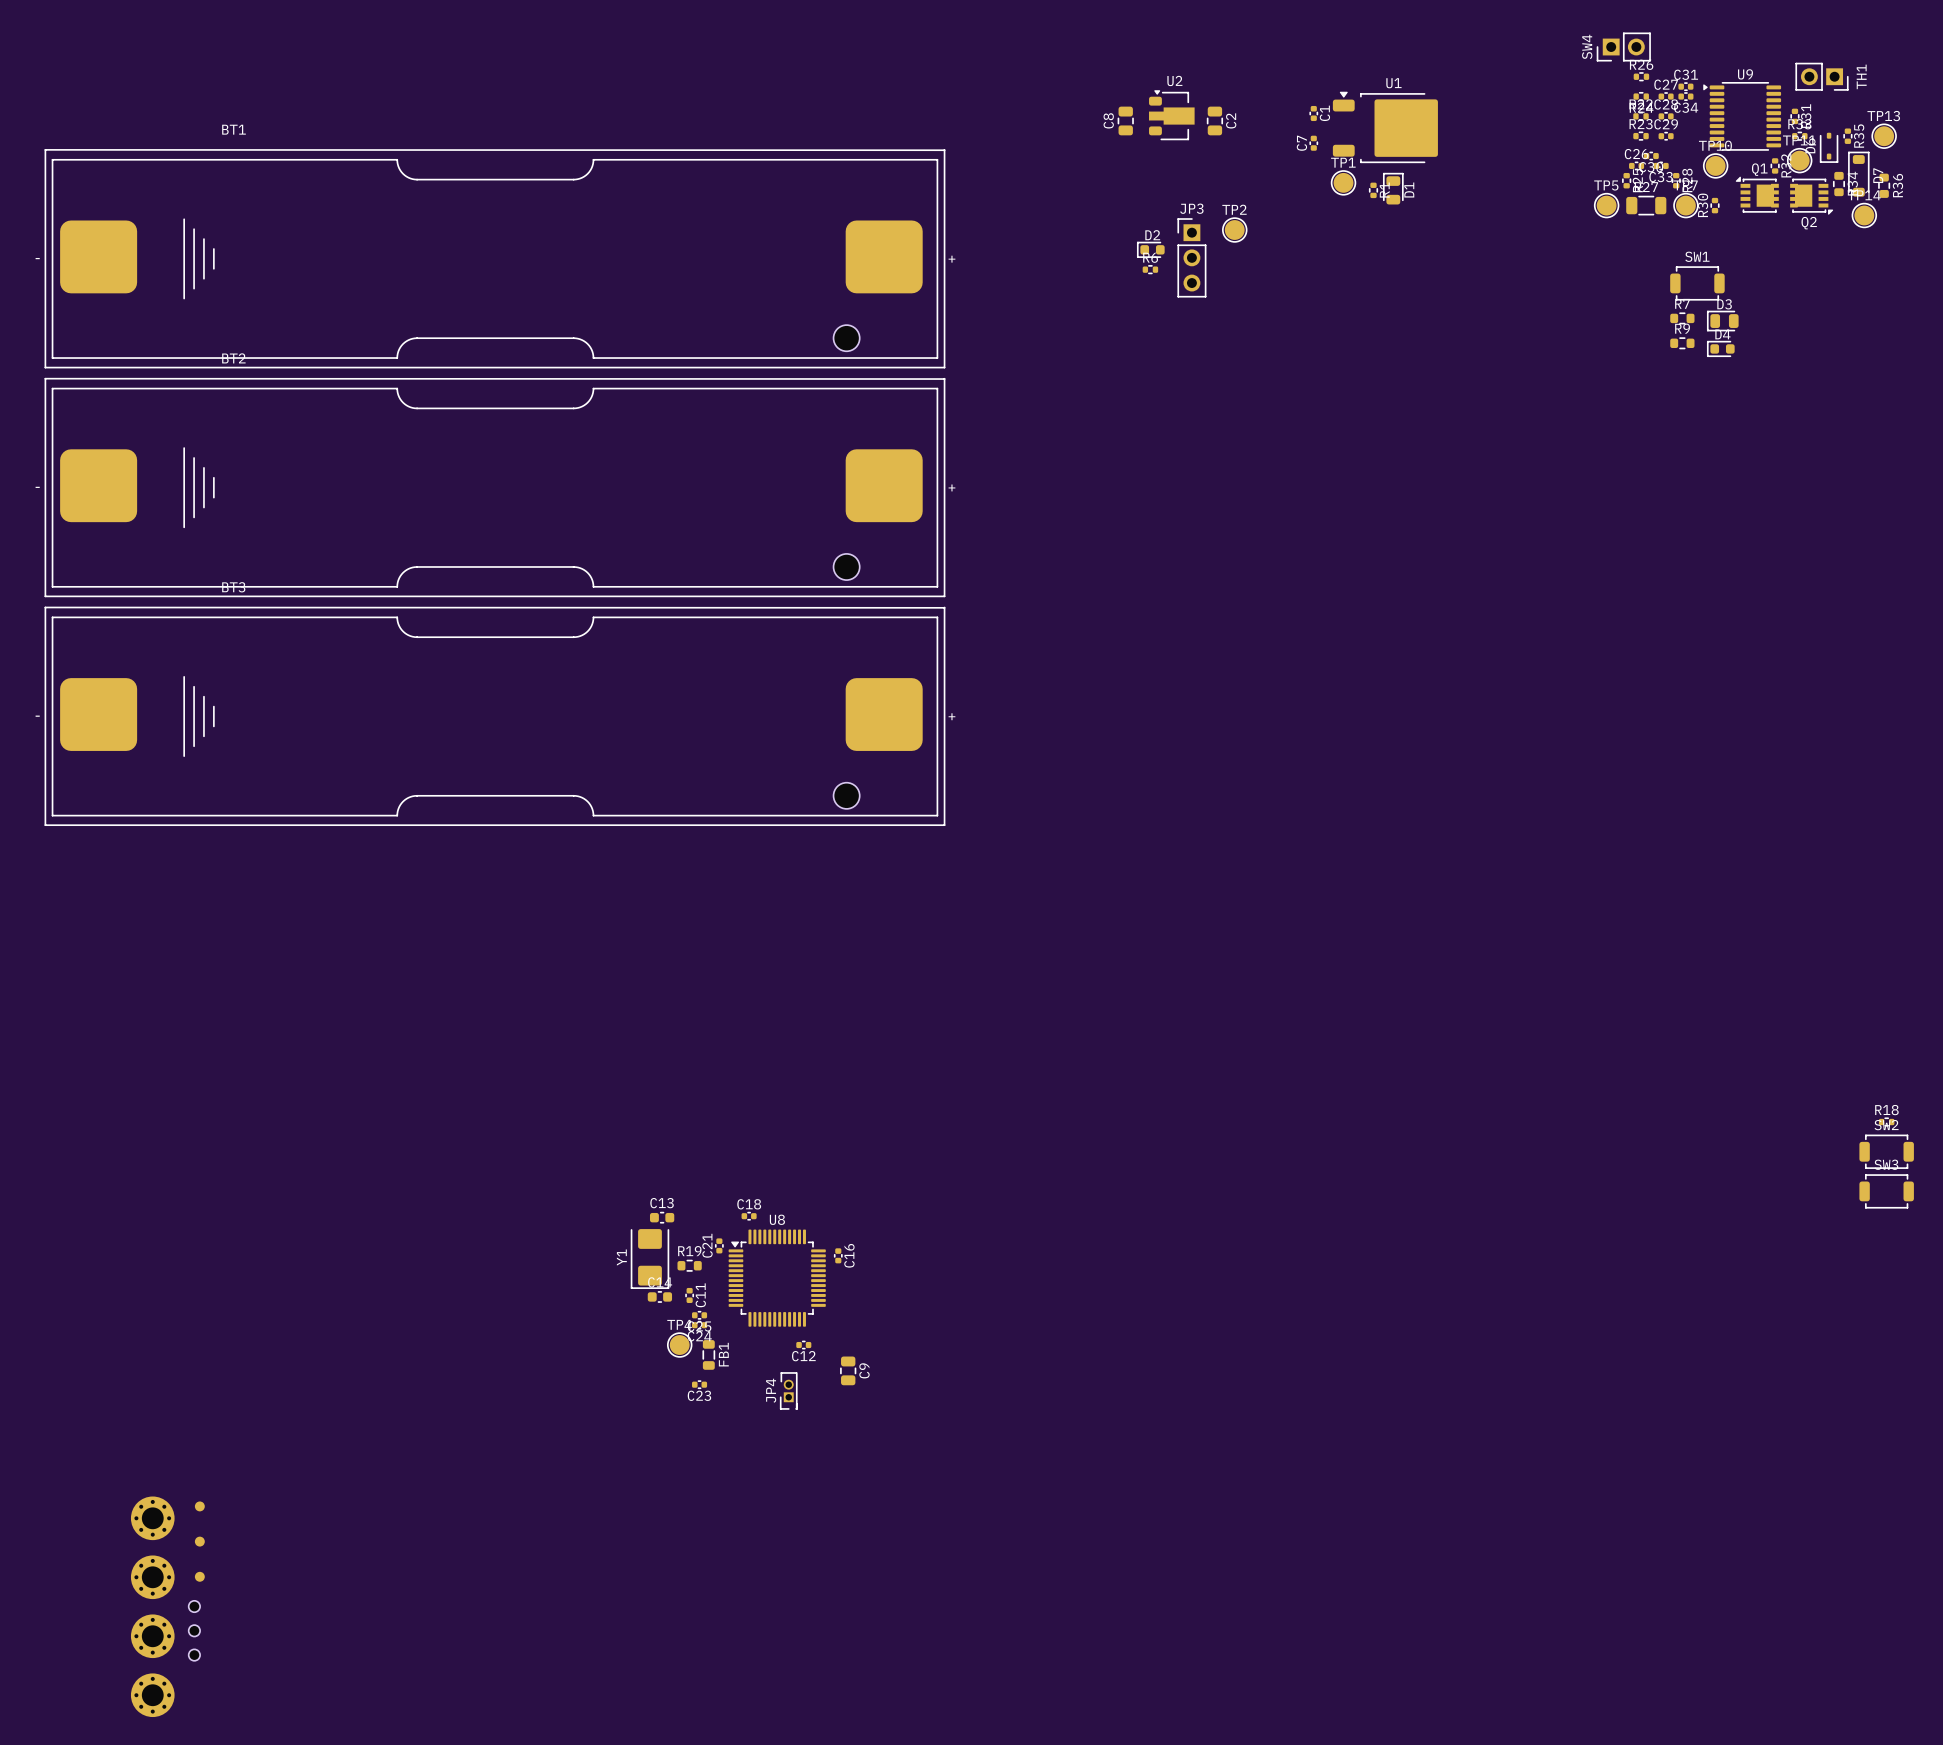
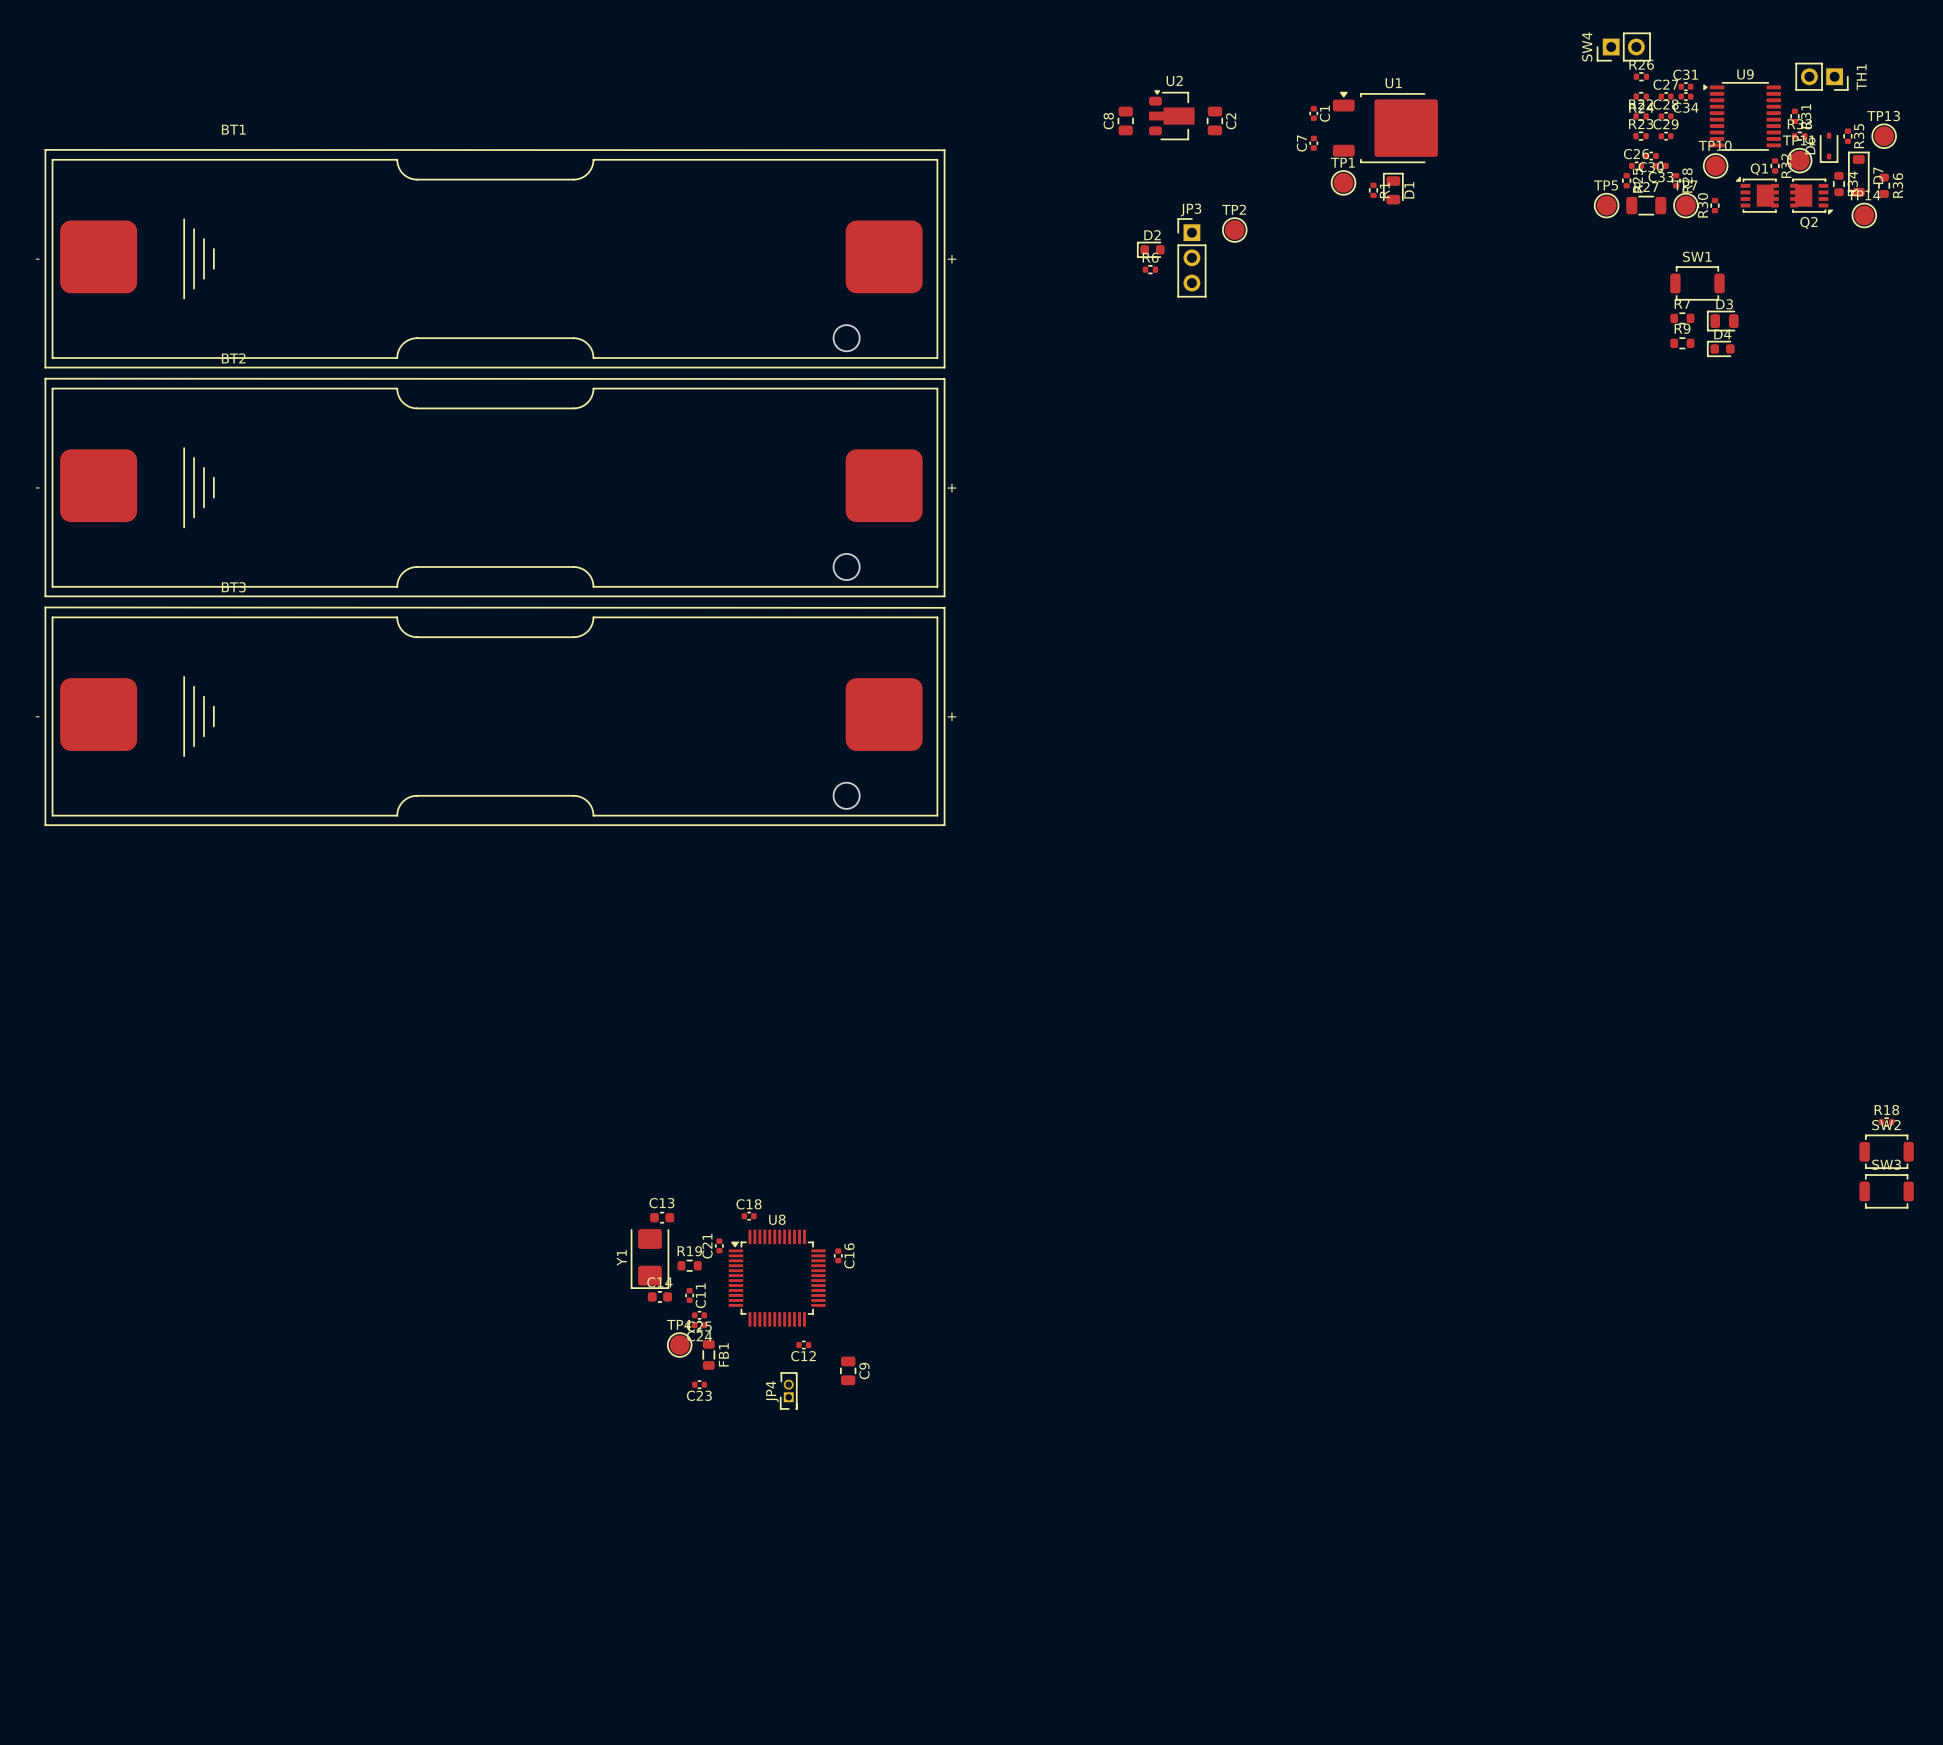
part: (199, 1506) -> none
part: (152, 1518) -> none
part: (199, 1541) -> none
part: (199, 1576) -> none
part: (152, 1577) -> none
part: (194, 1606) -> none
part: (194, 1630) -> none
part: (152, 1636) -> none
part: (194, 1655) -> none
part: (152, 1695) -> none

